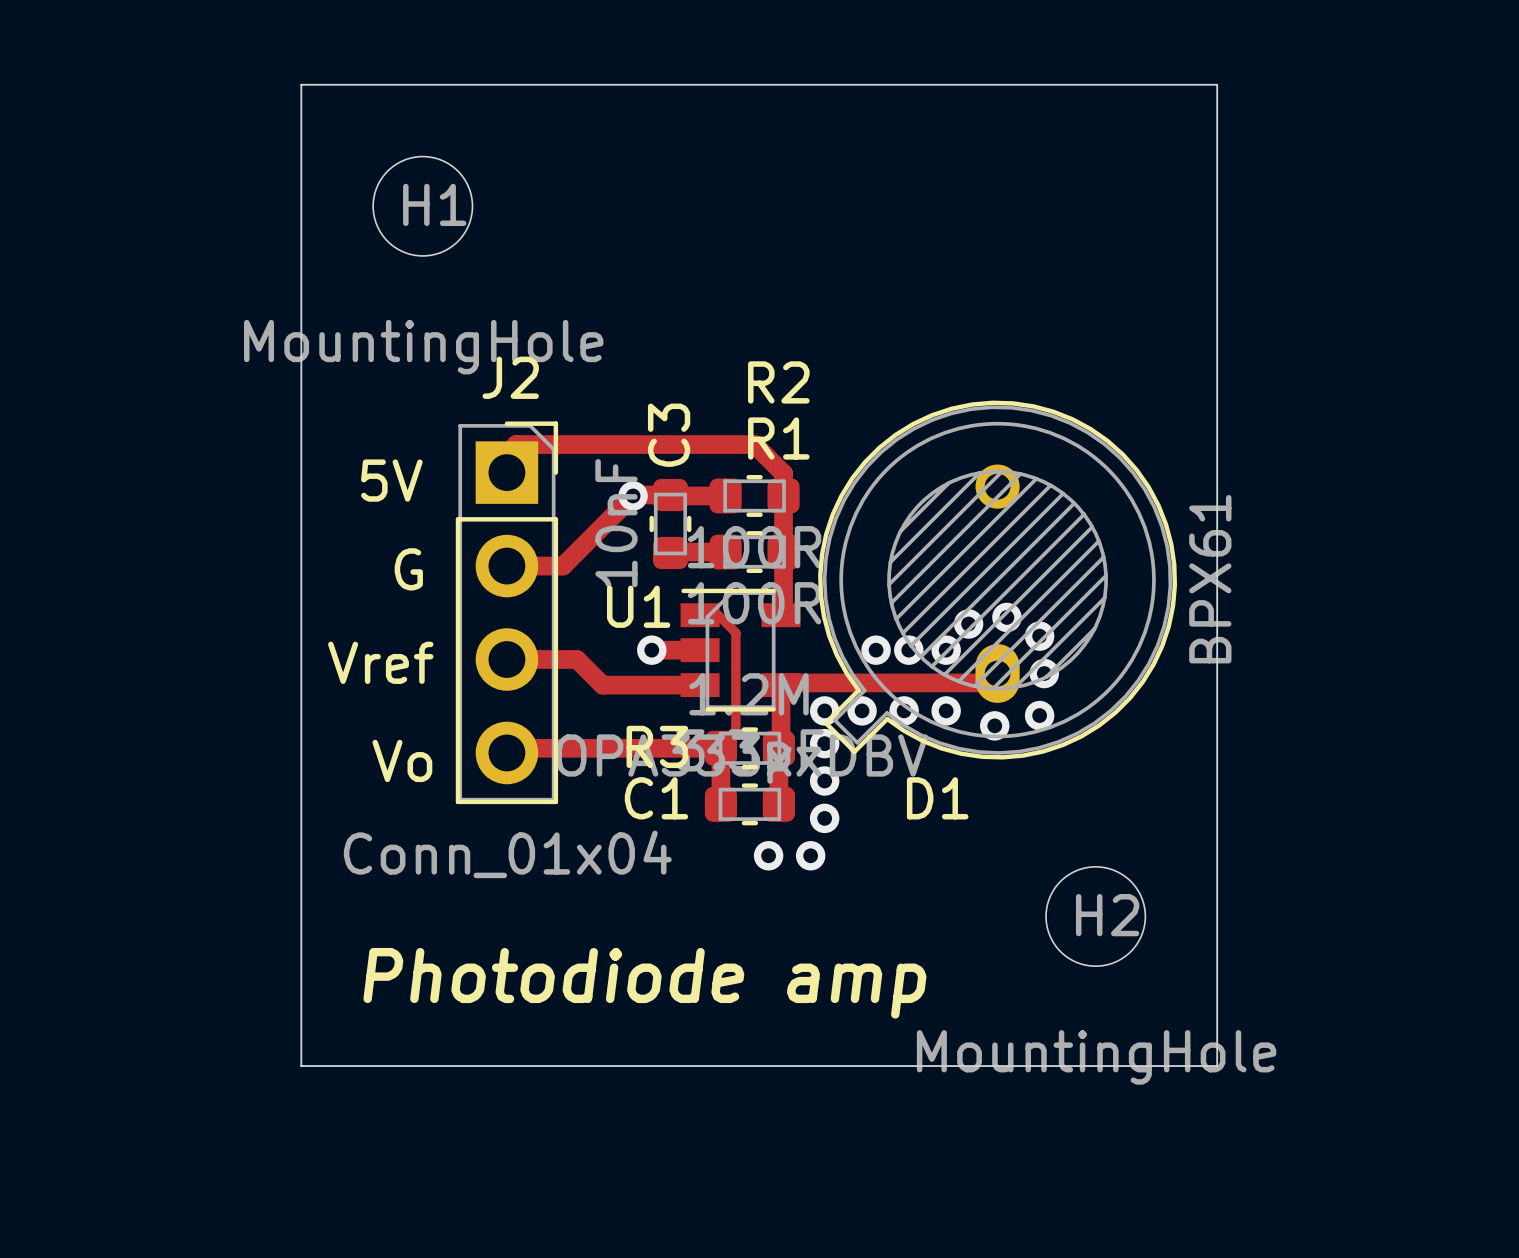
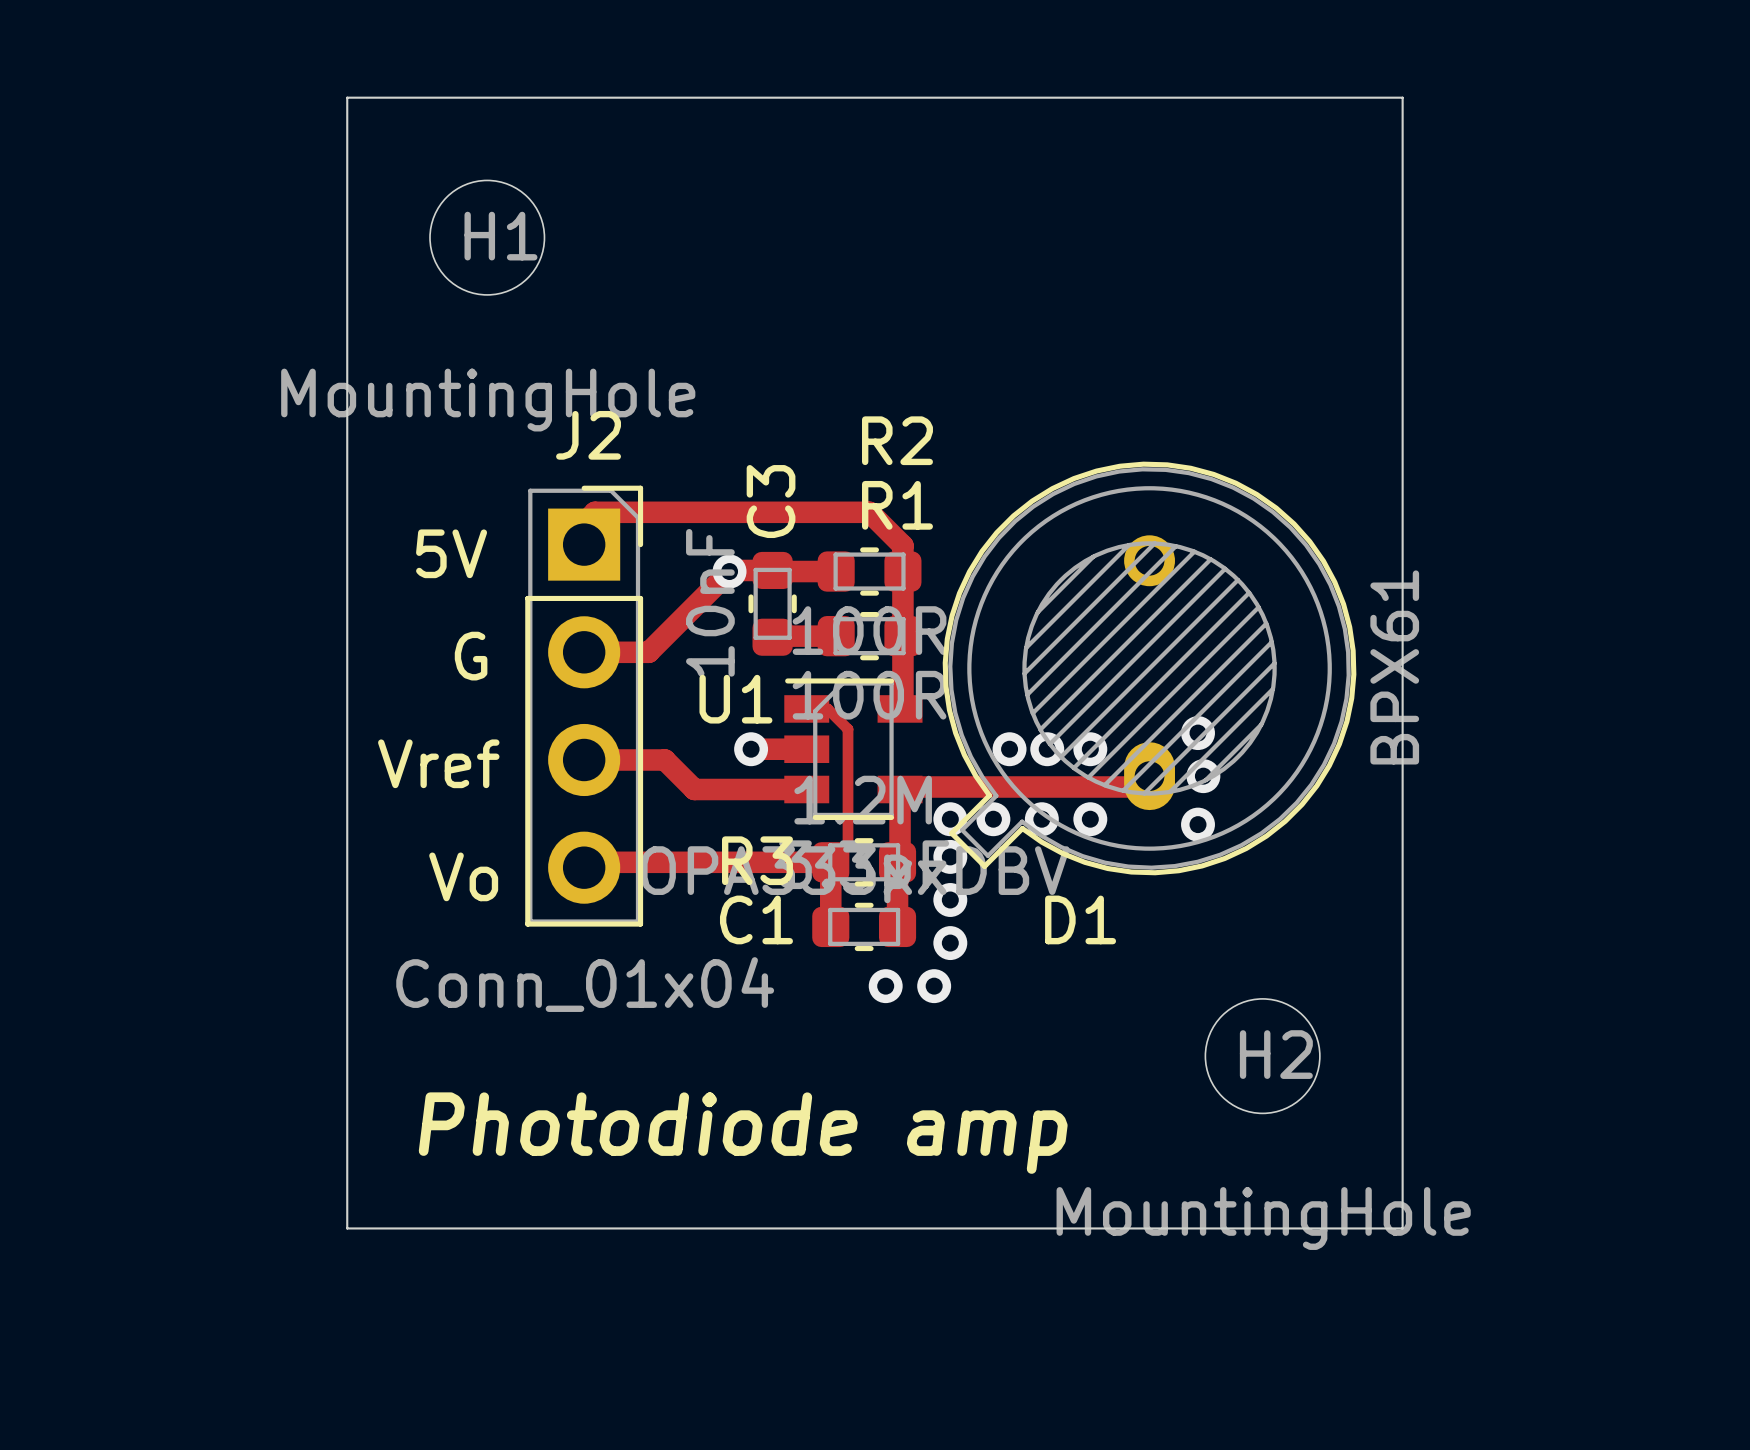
via: (1006, 617) -> none
via: (968, 624) -> none
via: (994, 725) -> none

